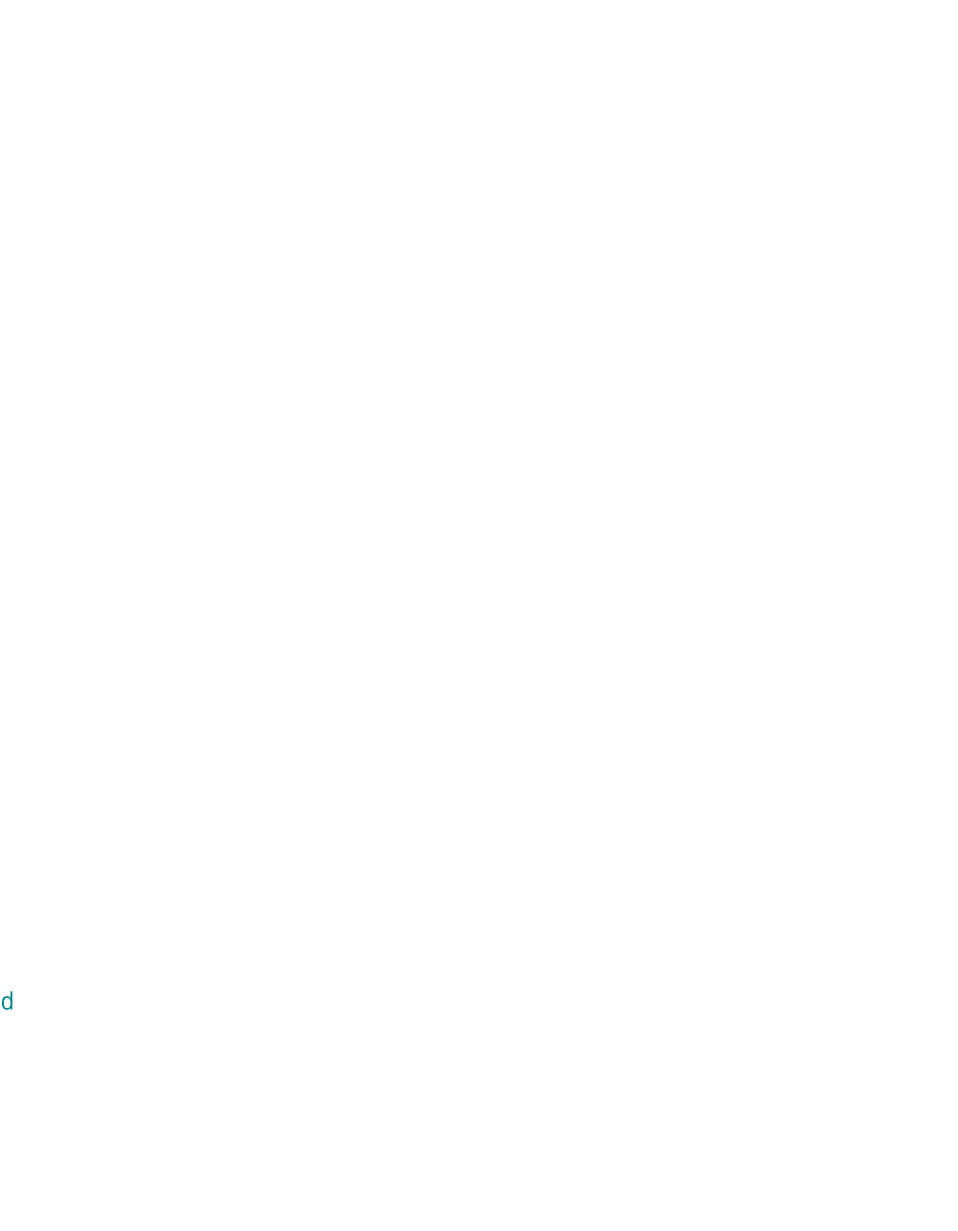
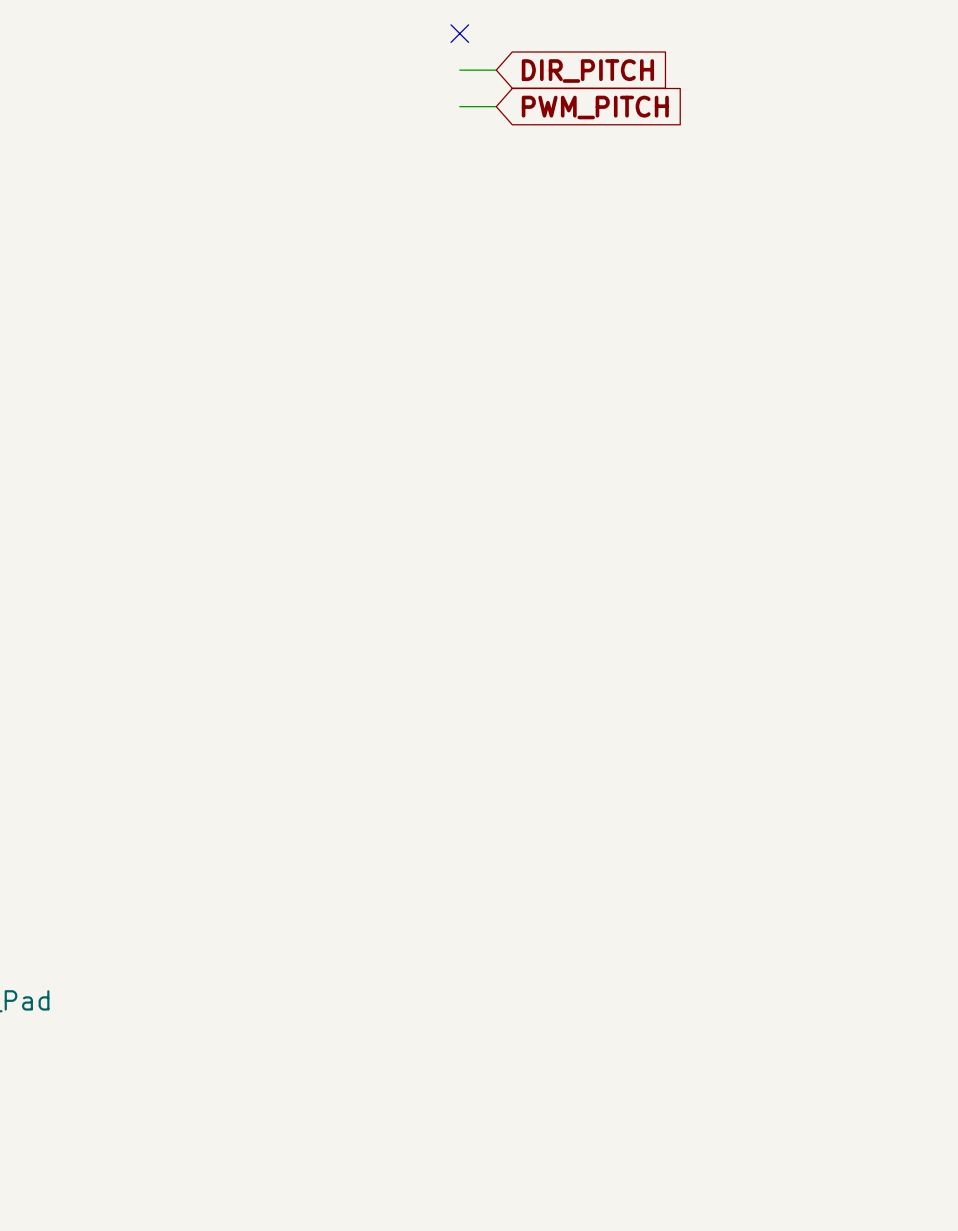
no-connect mark: none -> (459, 33)
wire: none -> (459, 70) (496, 70)
global label: none -> DIR_PITCH (587, 71)
wire: none -> (459, 106) (496, 106)
global label: none -> PWM_PITCH (595, 107)

